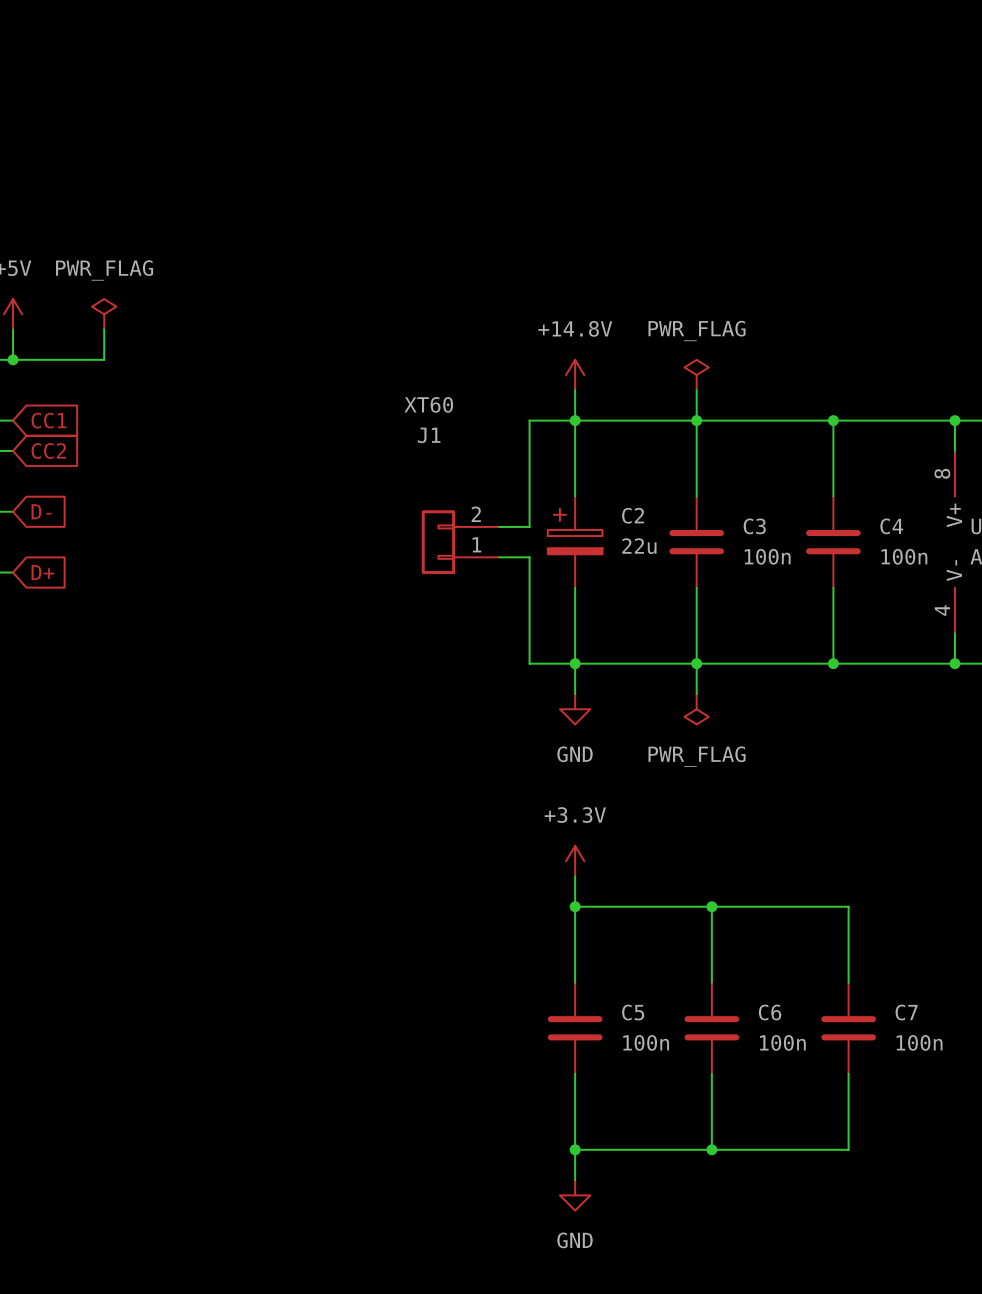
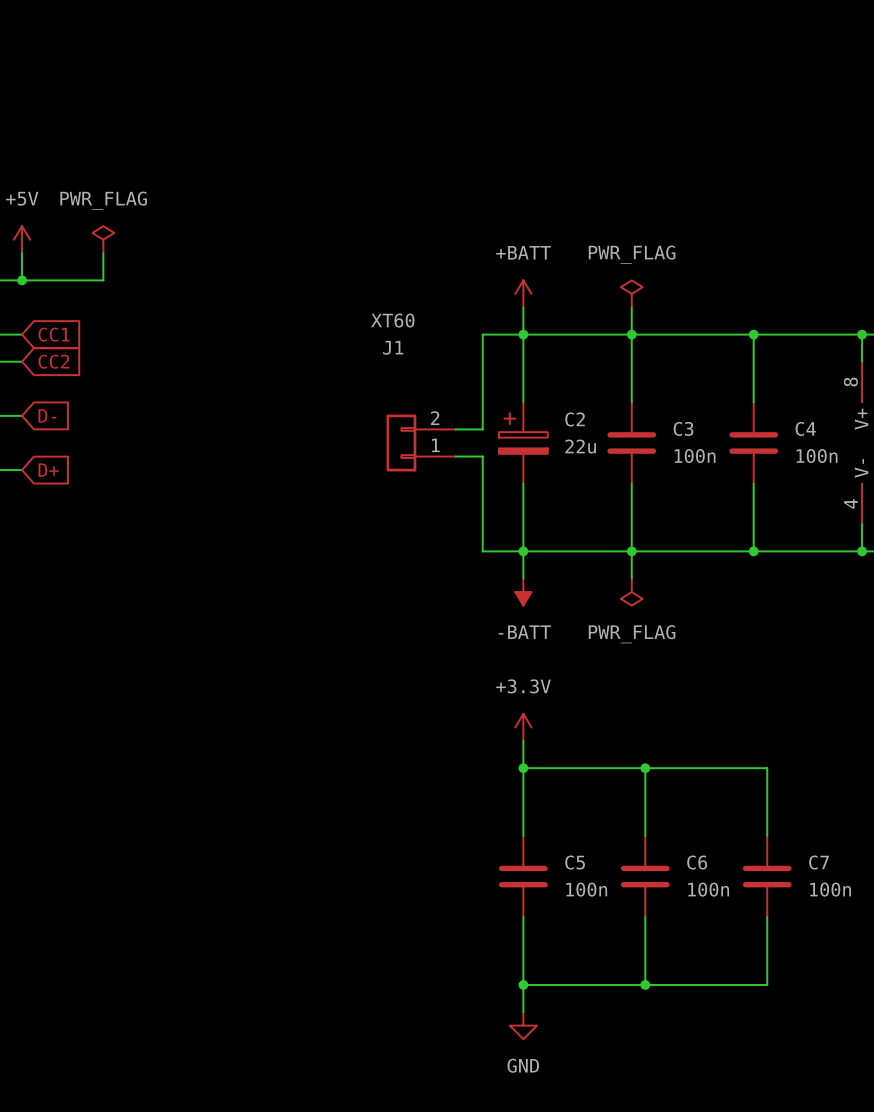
power symbol: +14.8V (575, 375) -> +BATT (523, 293)
power symbol: GND (575, 709) -> -BATT (523, 592)

